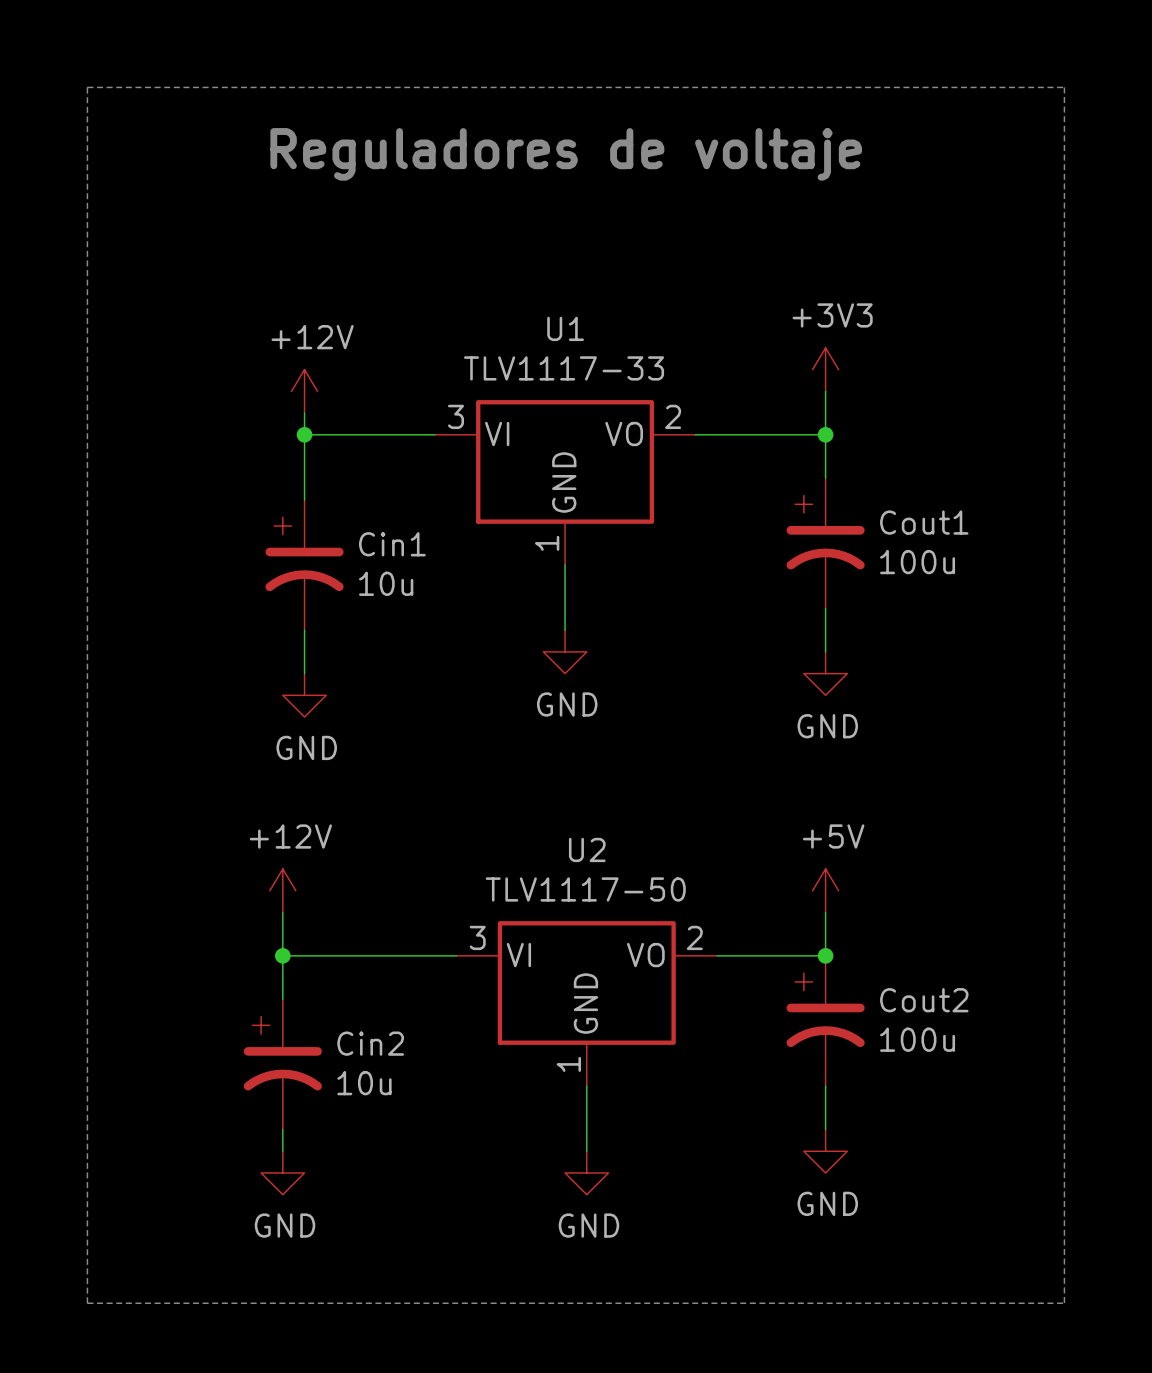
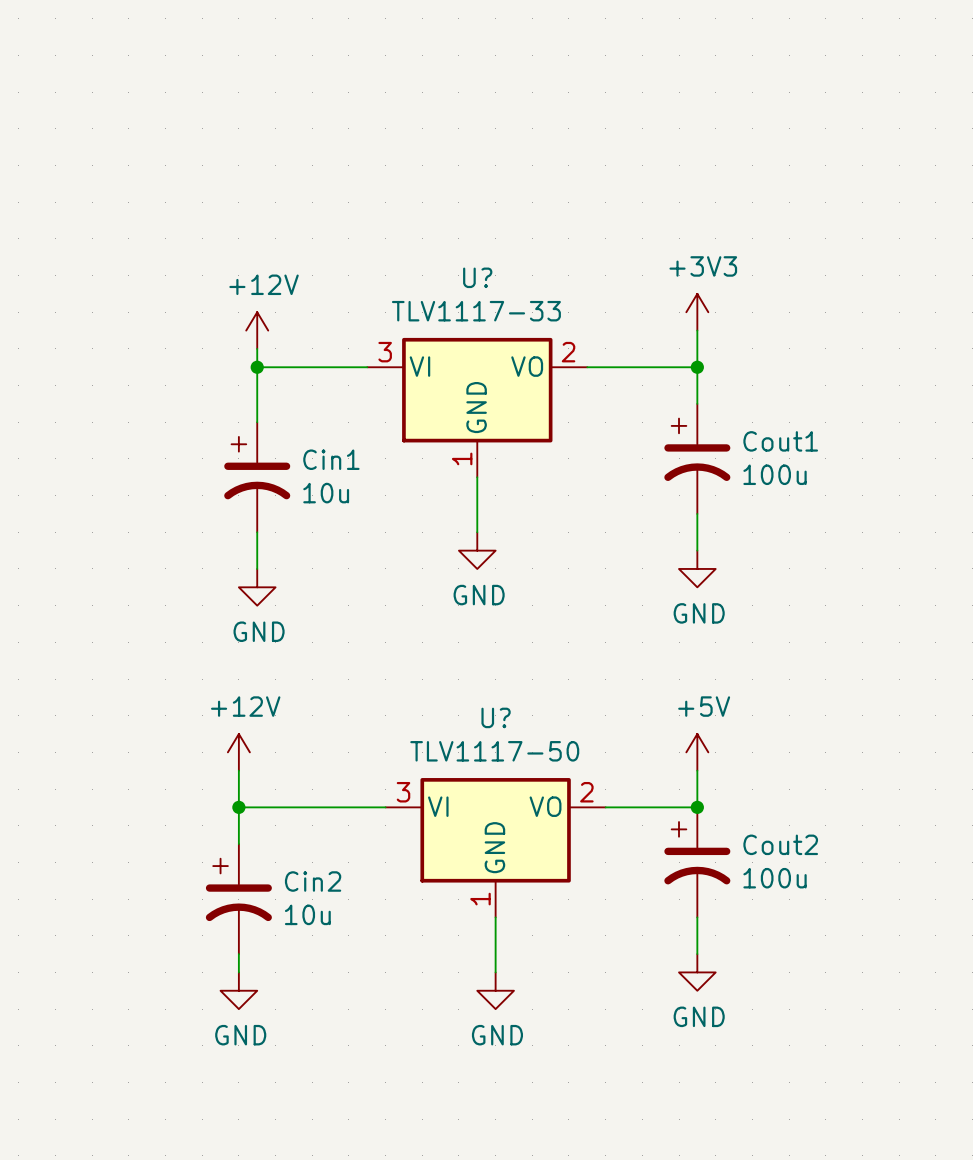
line: (87, 87) (87, 1303) (1064, 1303) (1064, 87) (87, 87) -> none
text: Reguladores de voltaje (566, 154) -> none
U1 name: U1 (565, 328) -> U? (477, 277)
U2 name: U2 (587, 849) -> U? (496, 717)

